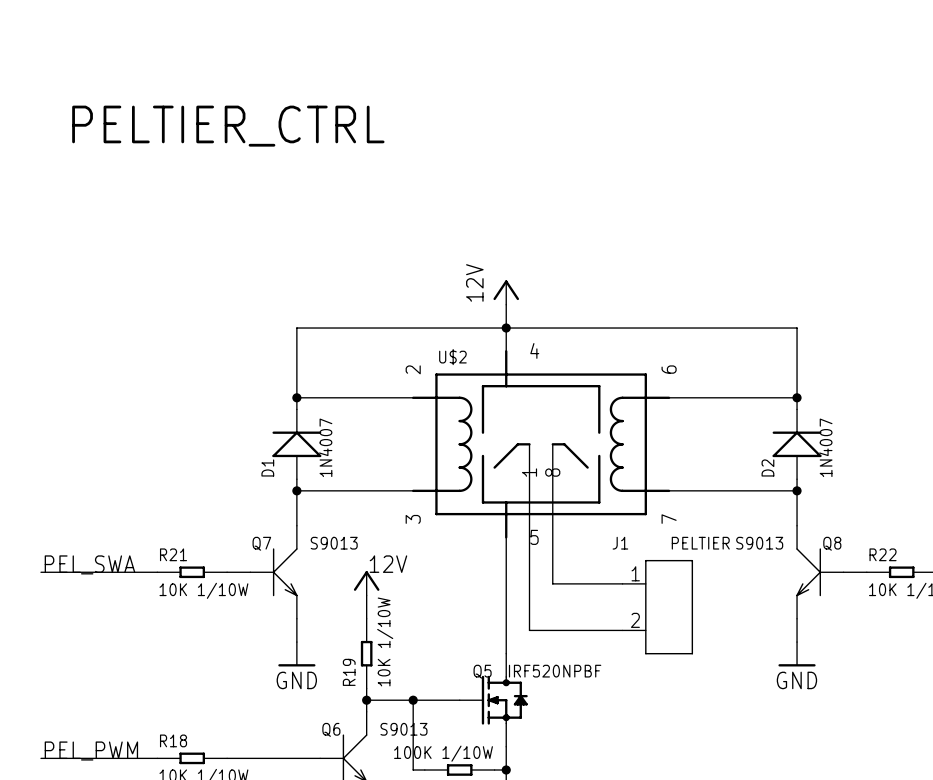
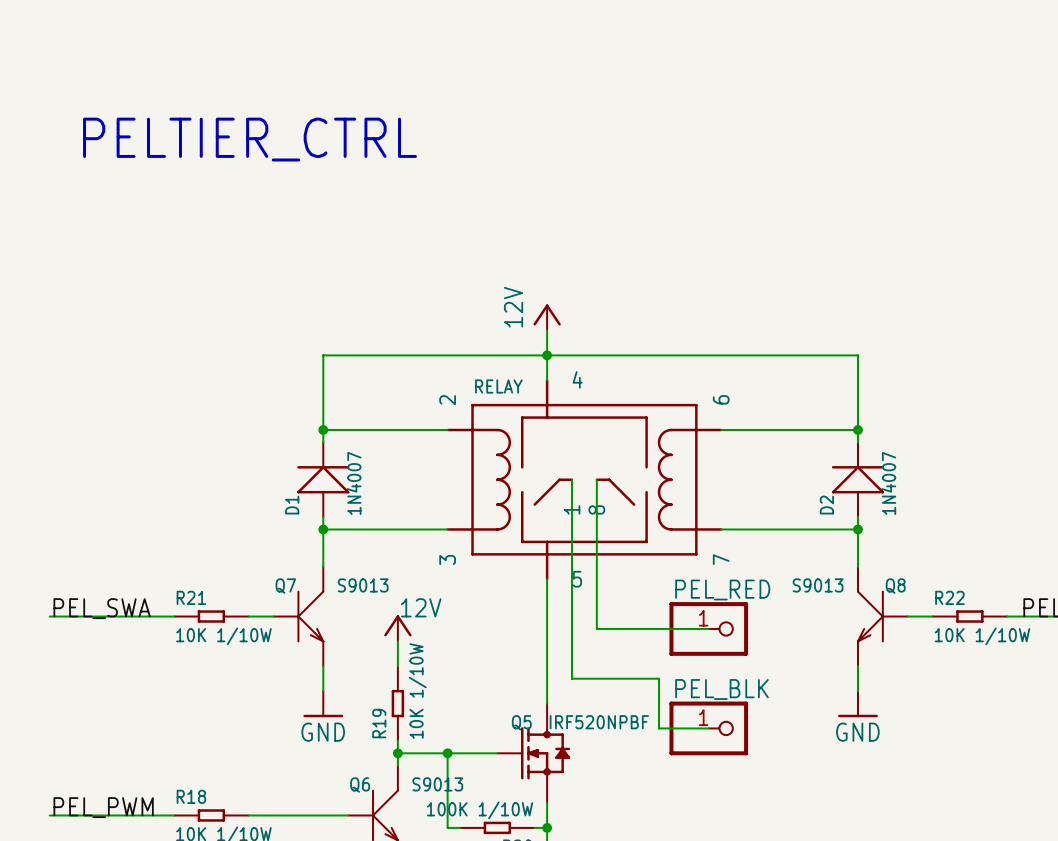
U$2 name: U$2 (452, 357) -> RELAY (498, 386)
PEL_RED: none -> (708, 628)
J1: PELTIER (657, 607) -> none
wire: (610, 630) (622, 630) -> (659, 678) (659, 728) (708, 728)
PEL_BLK: none -> (708, 728)

